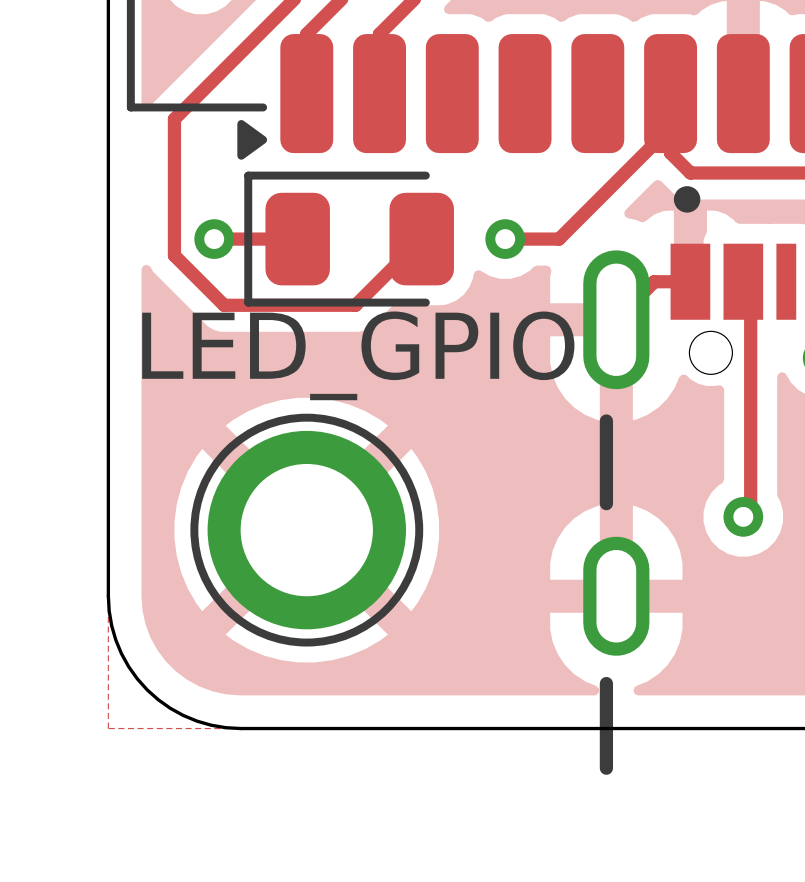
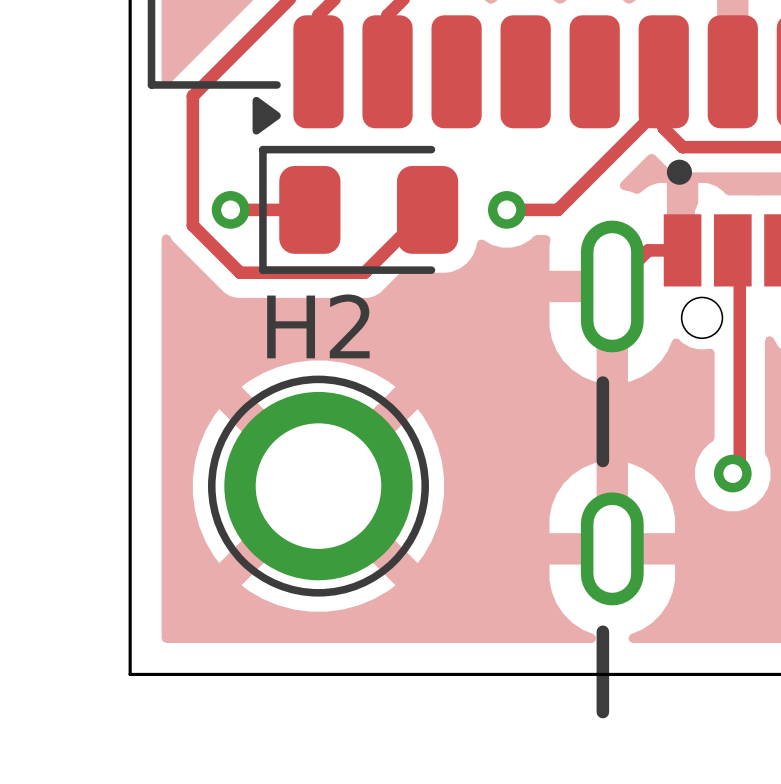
text: LED_GPIO (358, 355) -> none
H2 name: none -> H2 (318, 326)
board edge: (108, 596) (111, 625) (121, 653) (137, 678) (147, 689) (170, 708) (196, 721) (211, 725) (240, 728) -> (130, 548) (130, 674) (255, 674)

